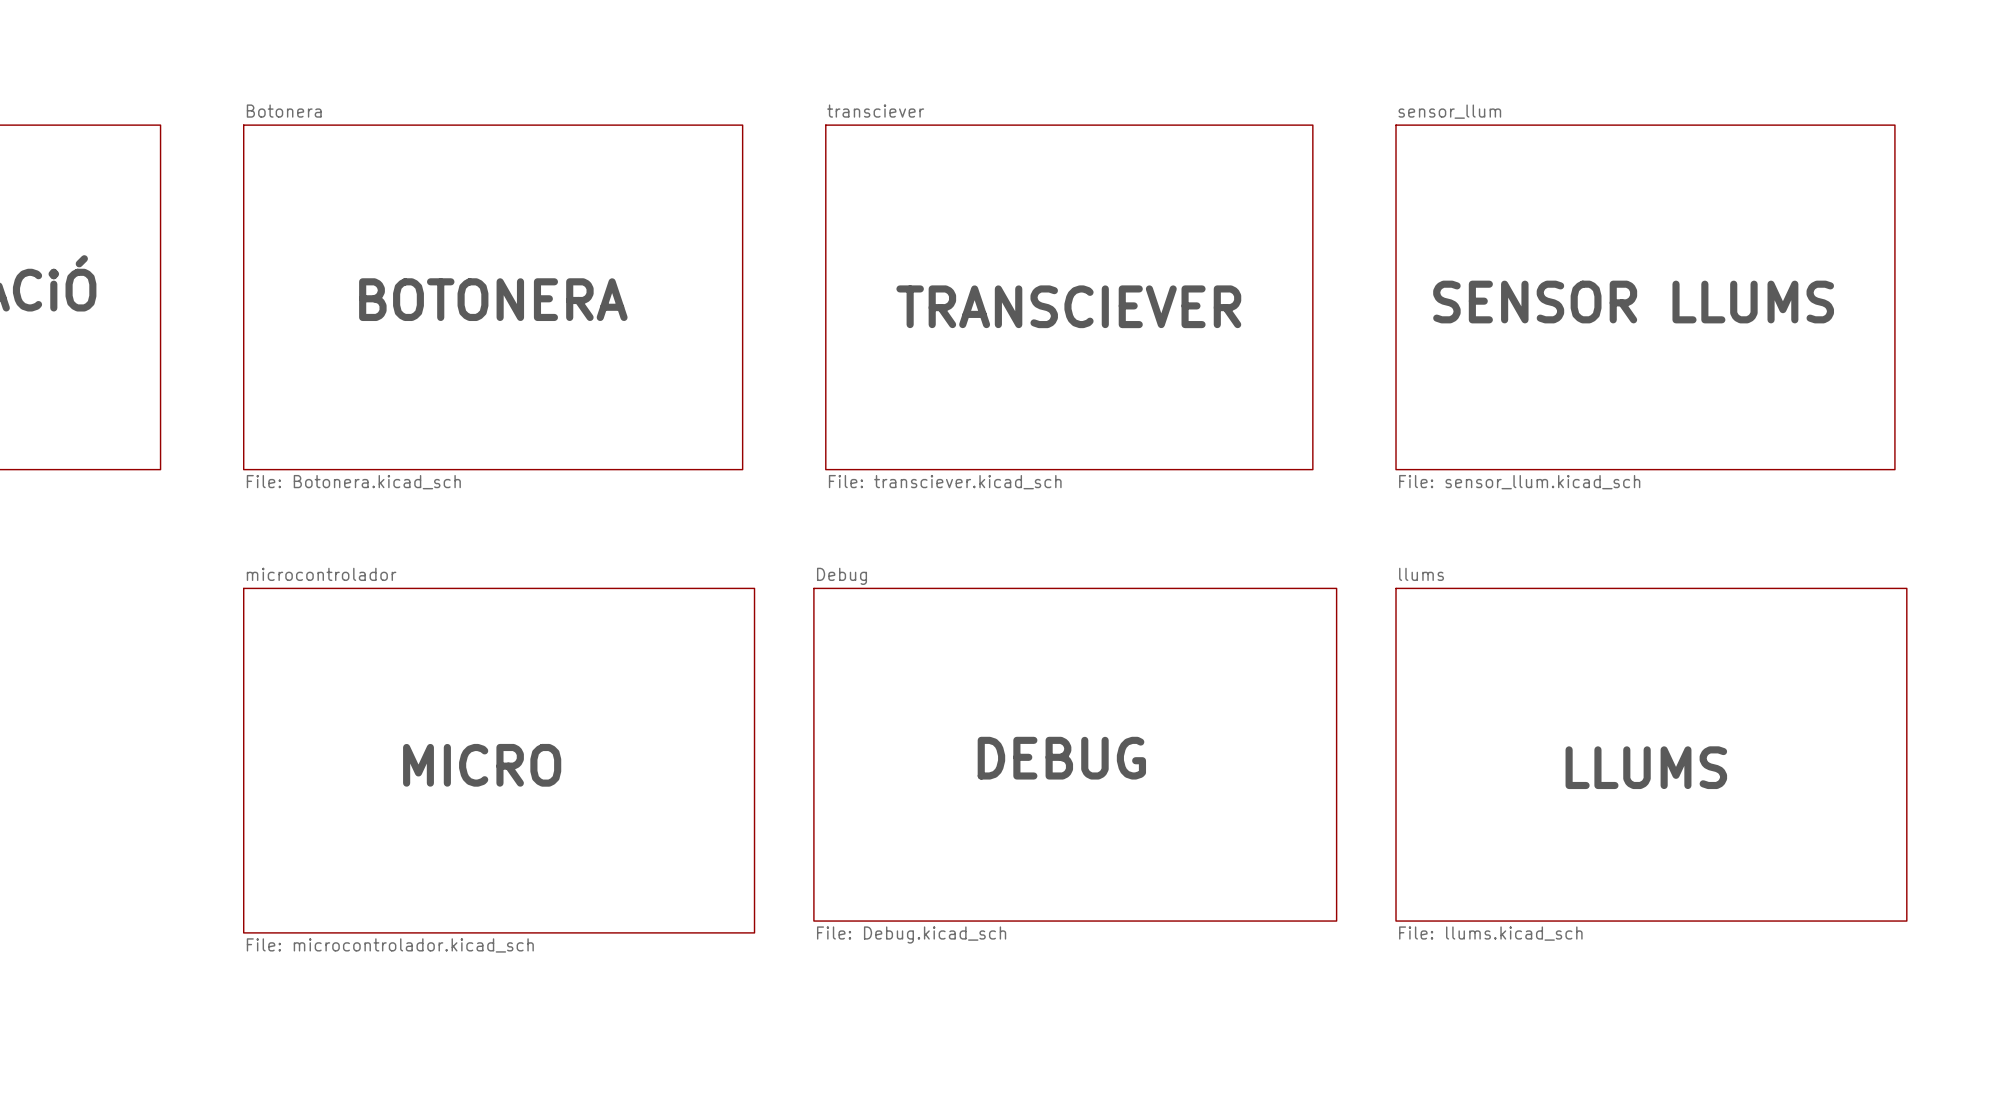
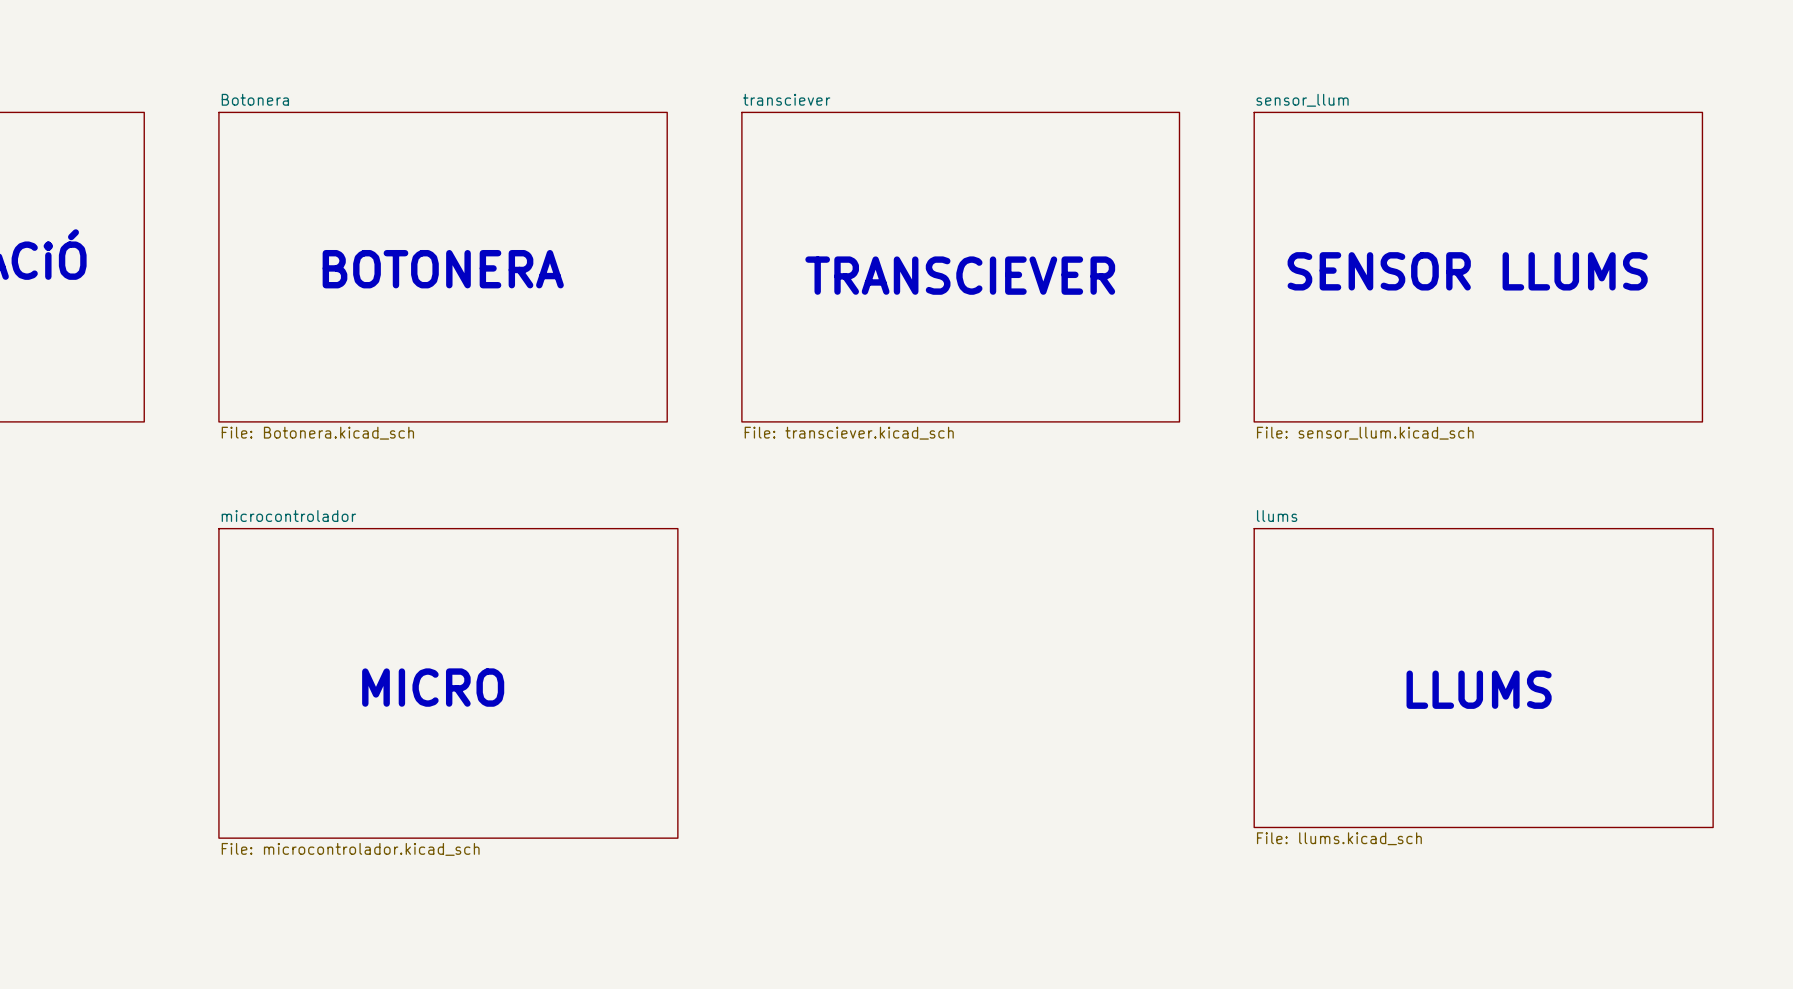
sheet Debug: File: Debug.kicad_sch (1075, 754) -> none
text: DEBUG (1061, 758) -> none

